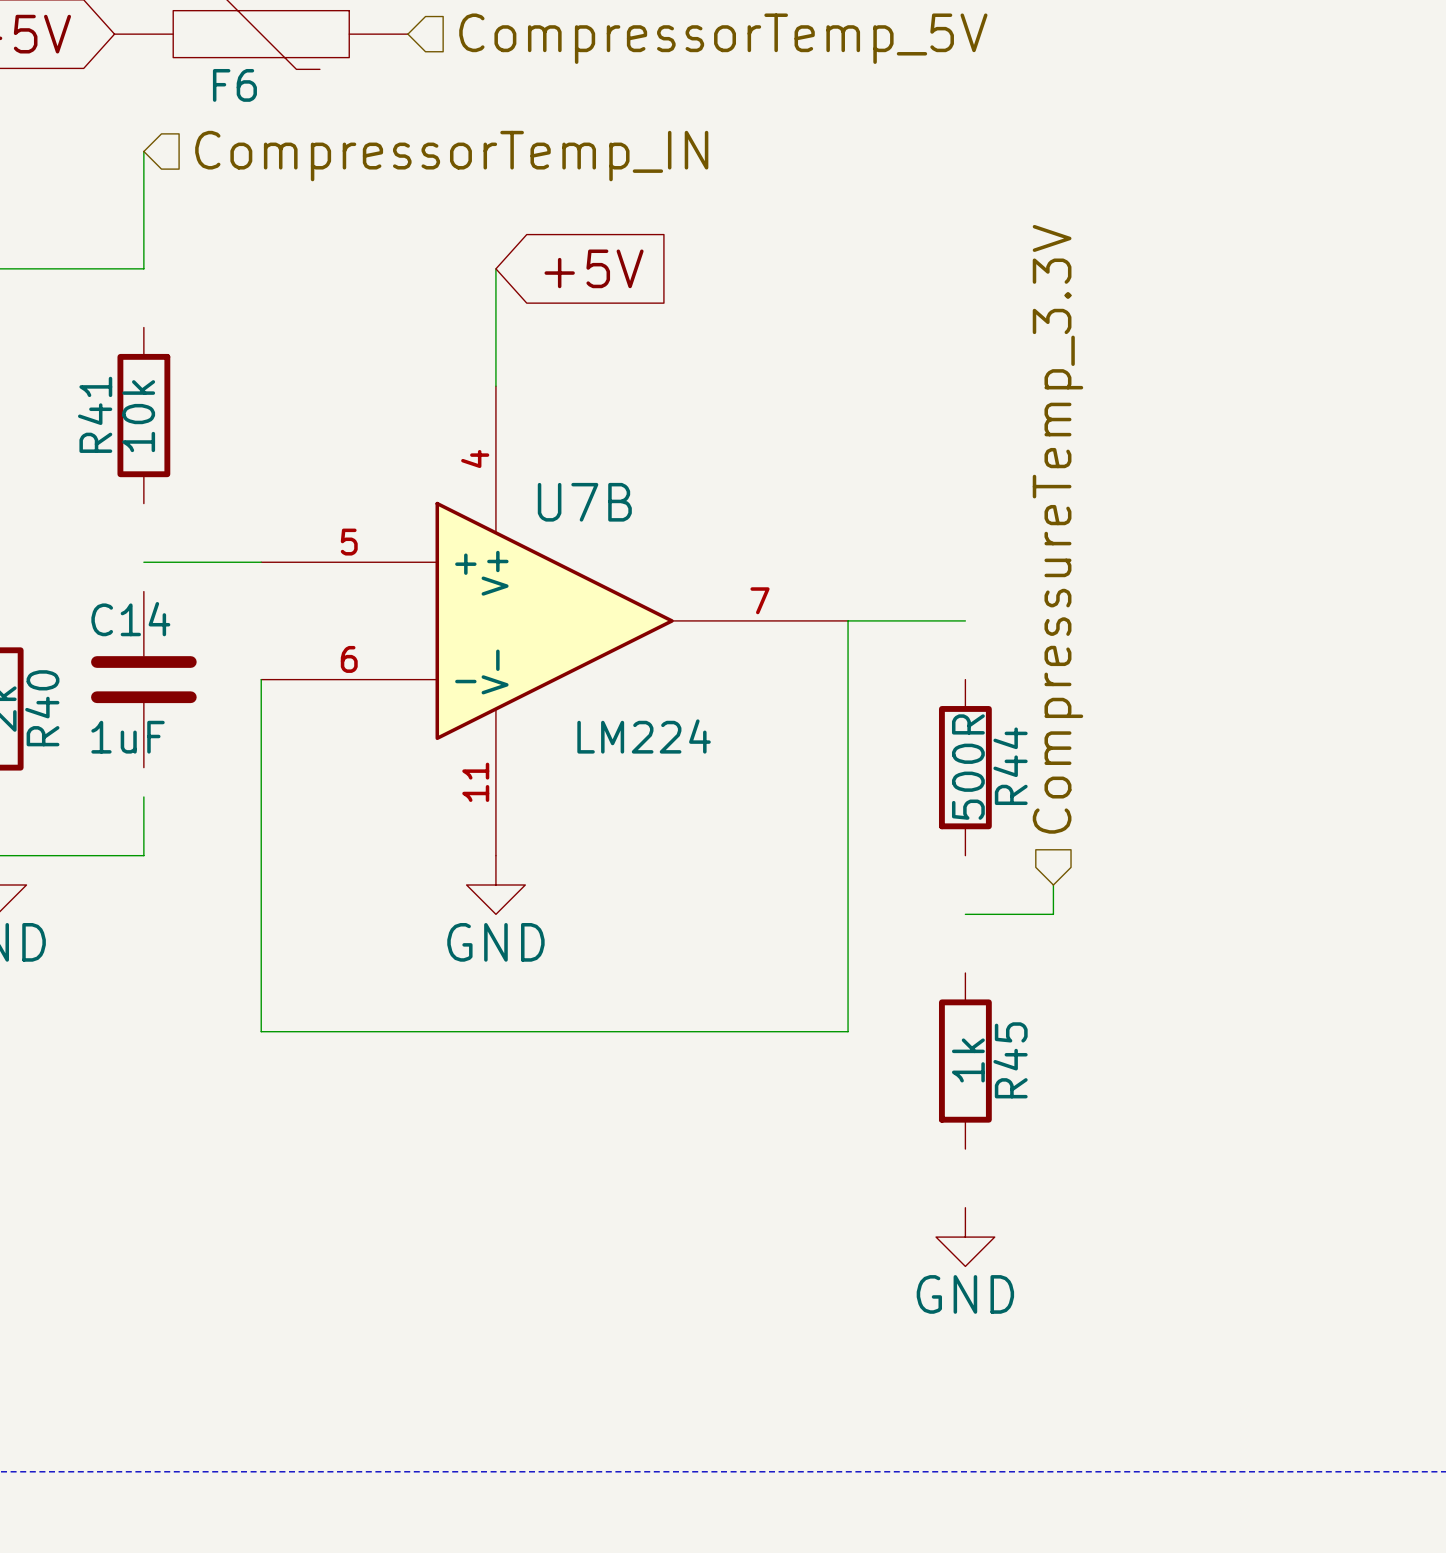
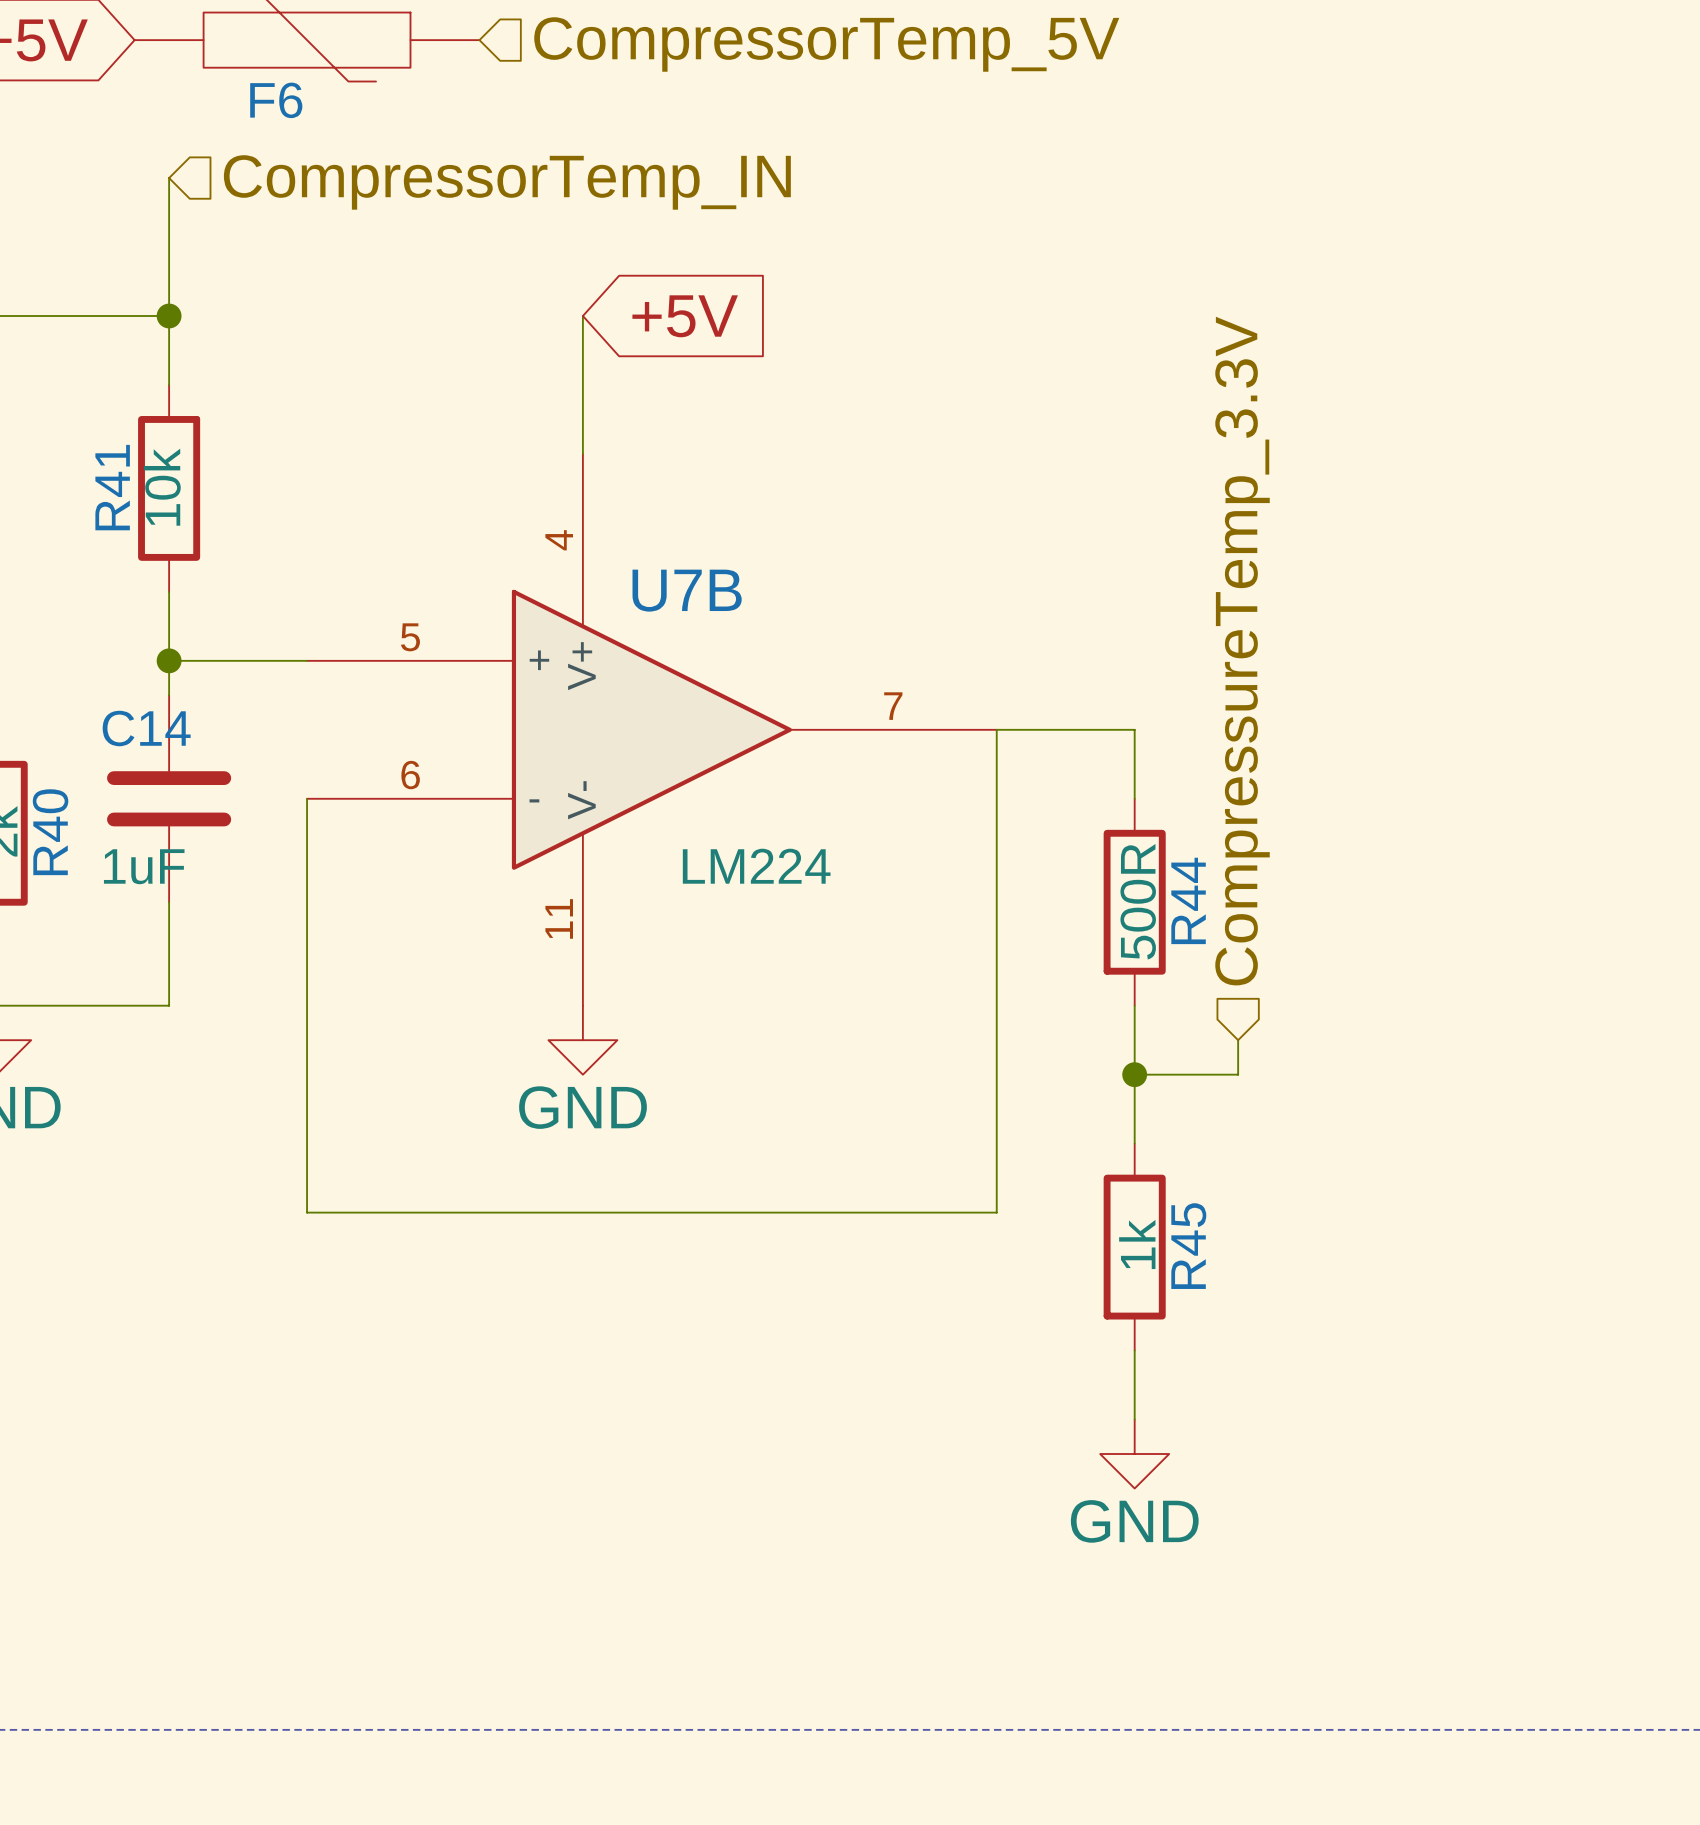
wire: none -> (169, 316) (169, 384)
junction: none -> (169, 316)
wire: none -> (169, 591) (169, 695)
junction: none -> (169, 660)
wire: none -> (1134, 729) (1134, 798)
wire: none -> (169, 902) (169, 936)
wire: none -> (1134, 1005) (1134, 1143)
junction: none -> (1134, 1074)
wire: none -> (1134, 1350) (1134, 1419)

